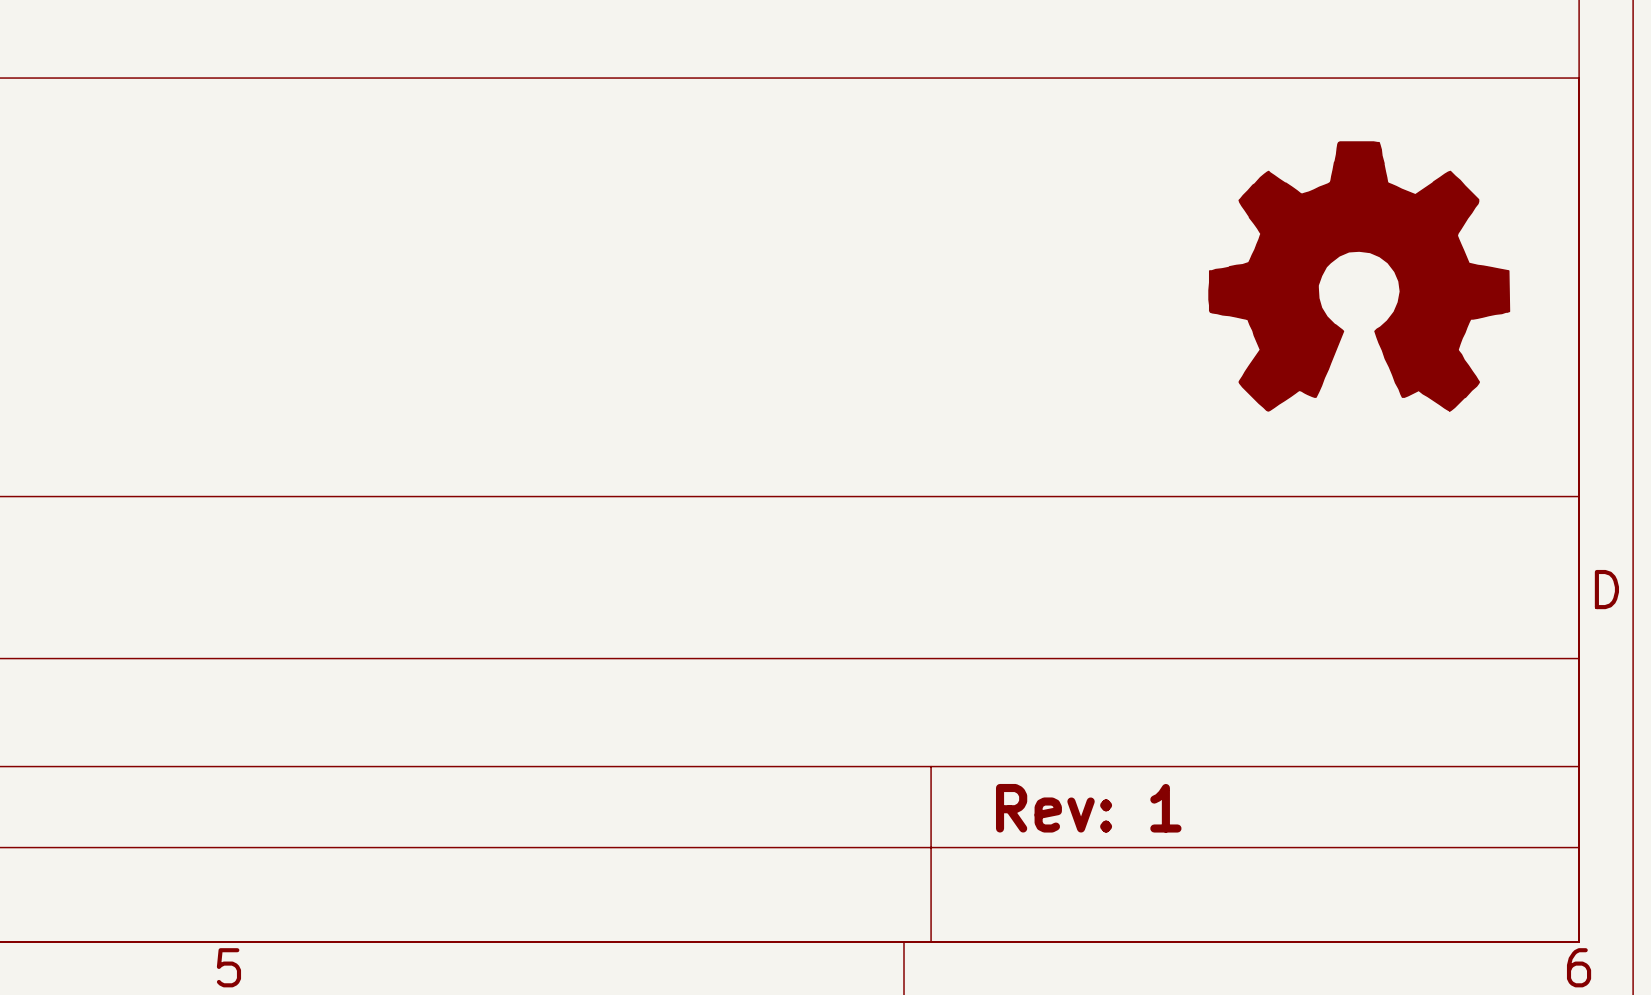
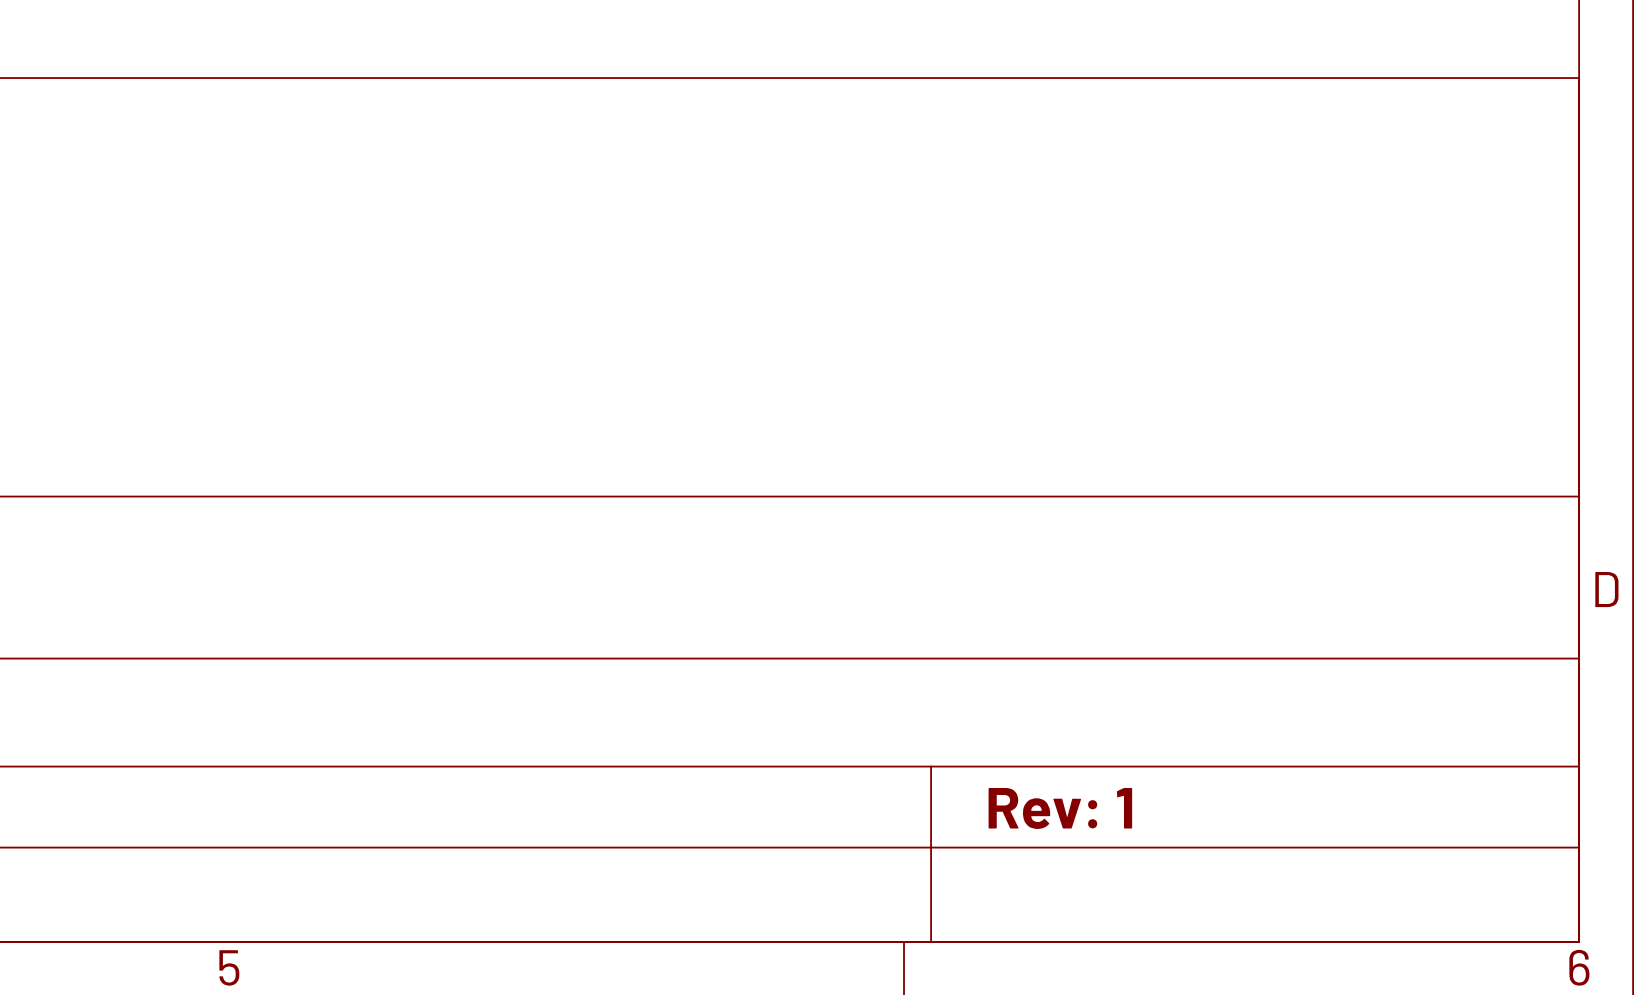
part: (1359, 276) -> none

